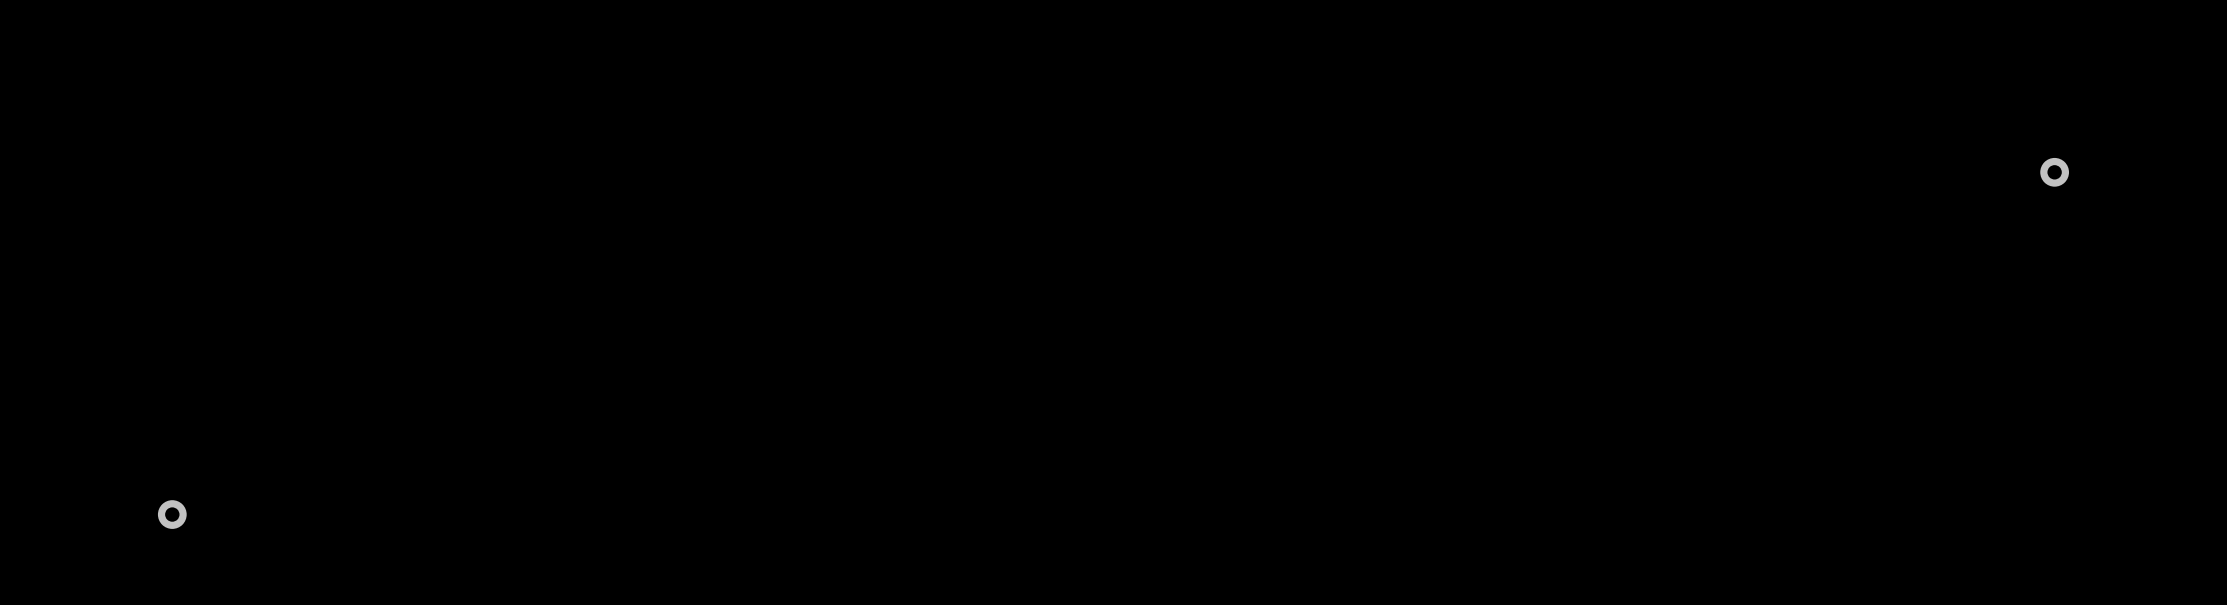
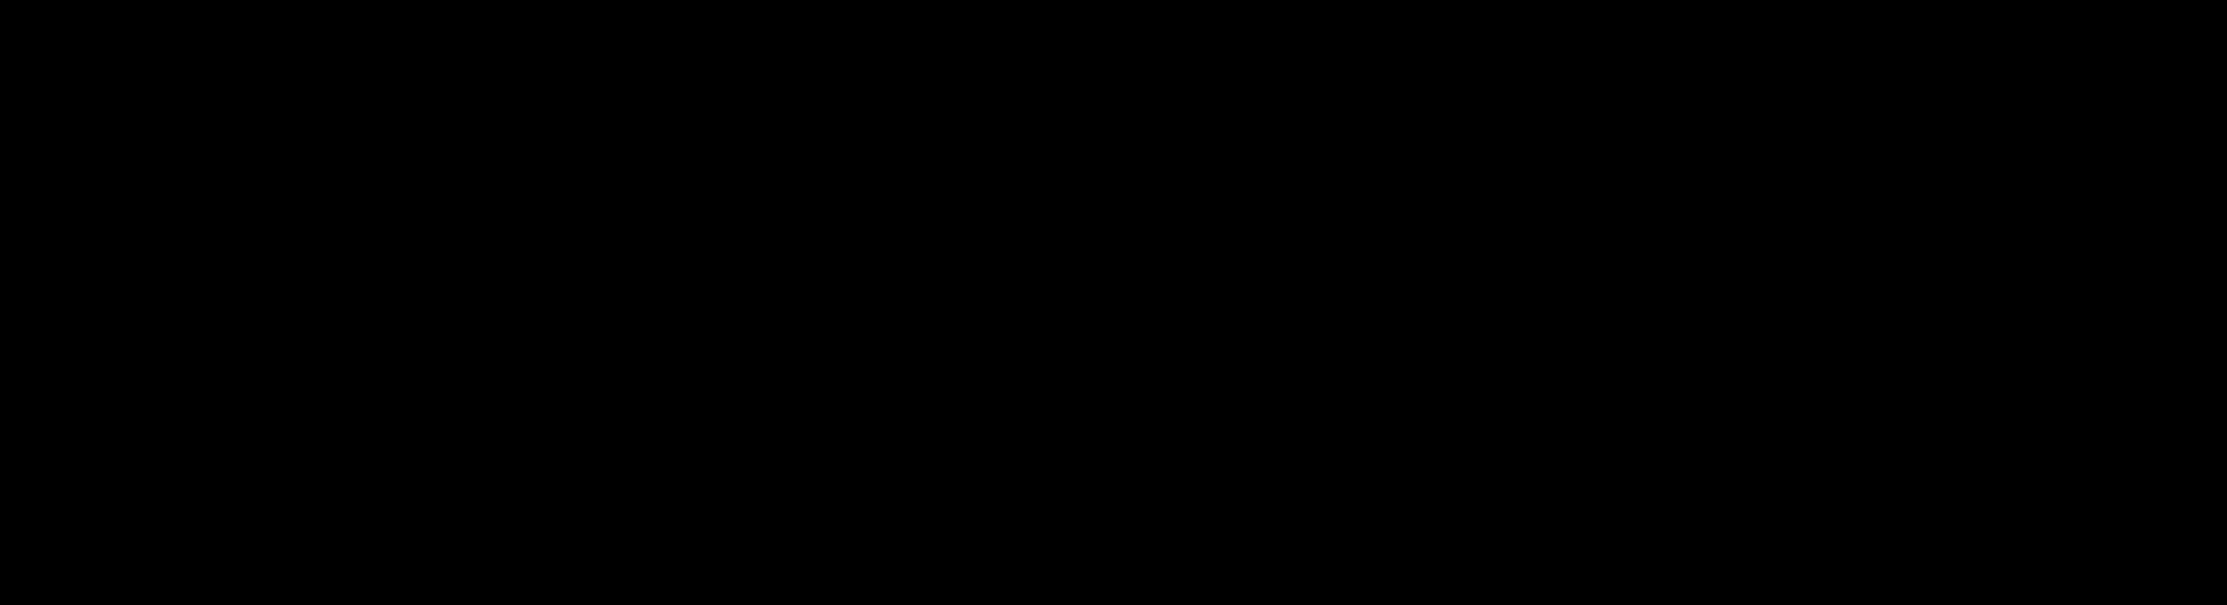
via: (2054, 172) -> none
via: (172, 514) -> none

